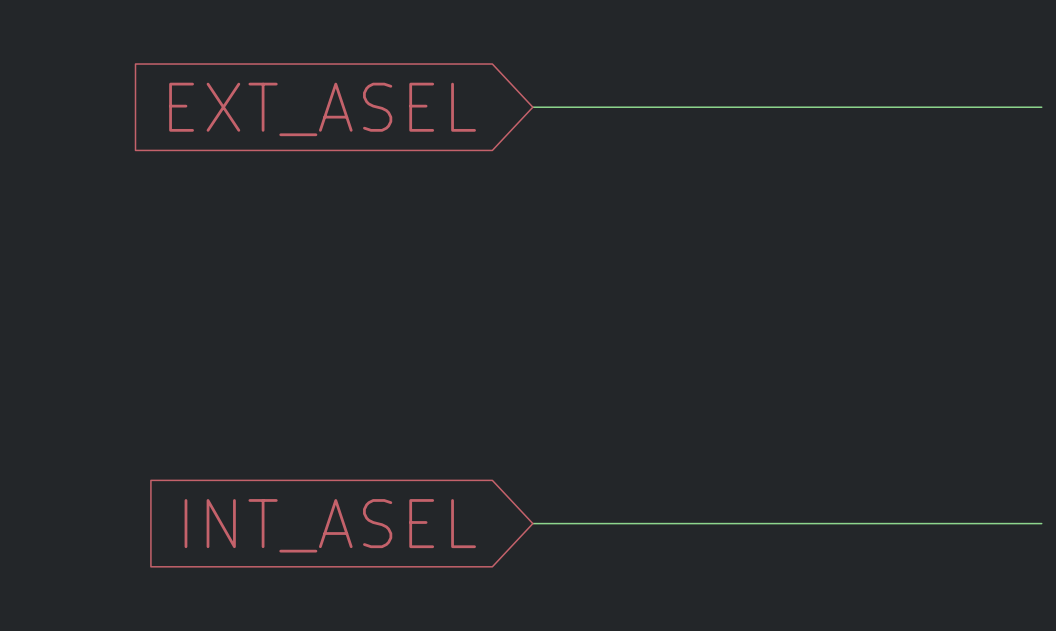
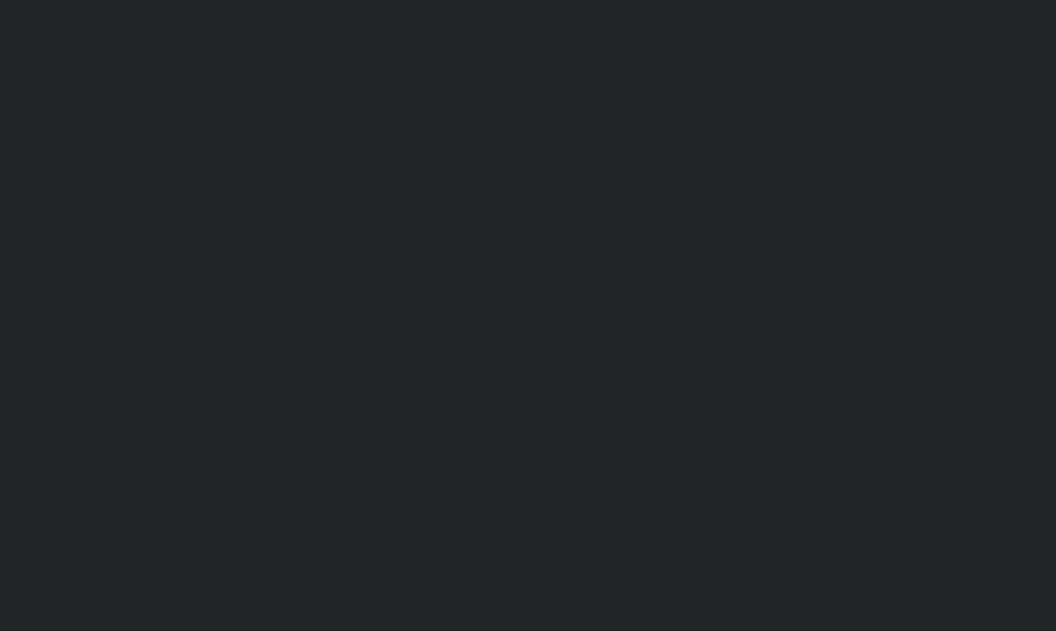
wire: (532, 107) (1041, 107) -> none
global label: EXT_ASEL (322, 109) -> none
wire: (532, 523) (1041, 523) -> none
global label: INT_ASEL (330, 525) -> none

